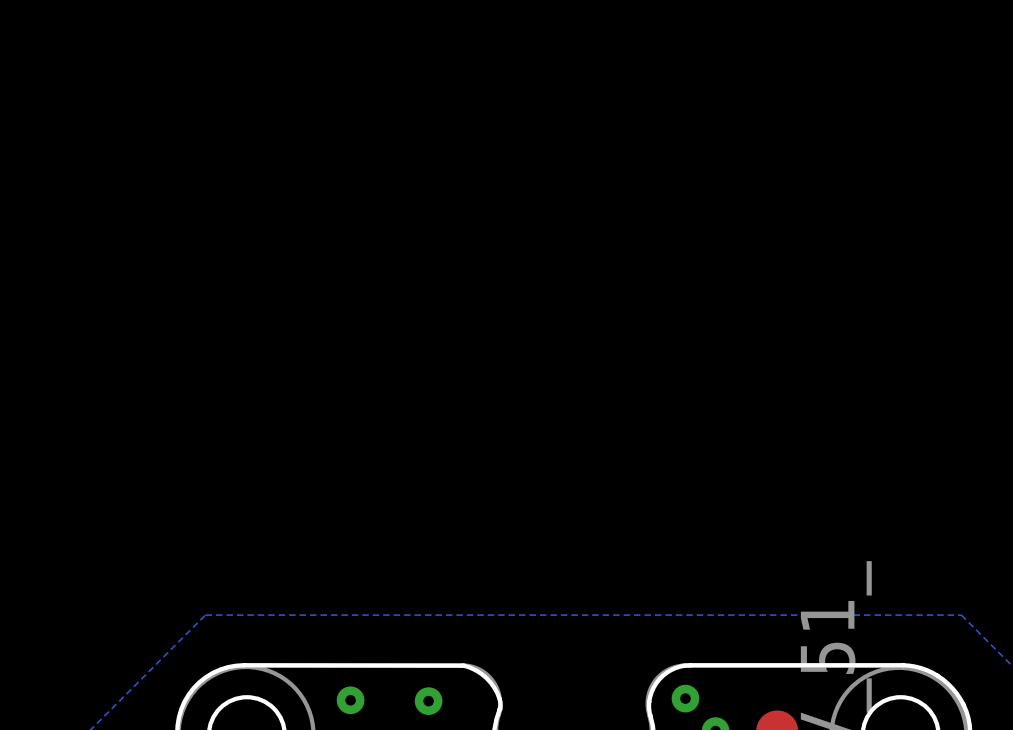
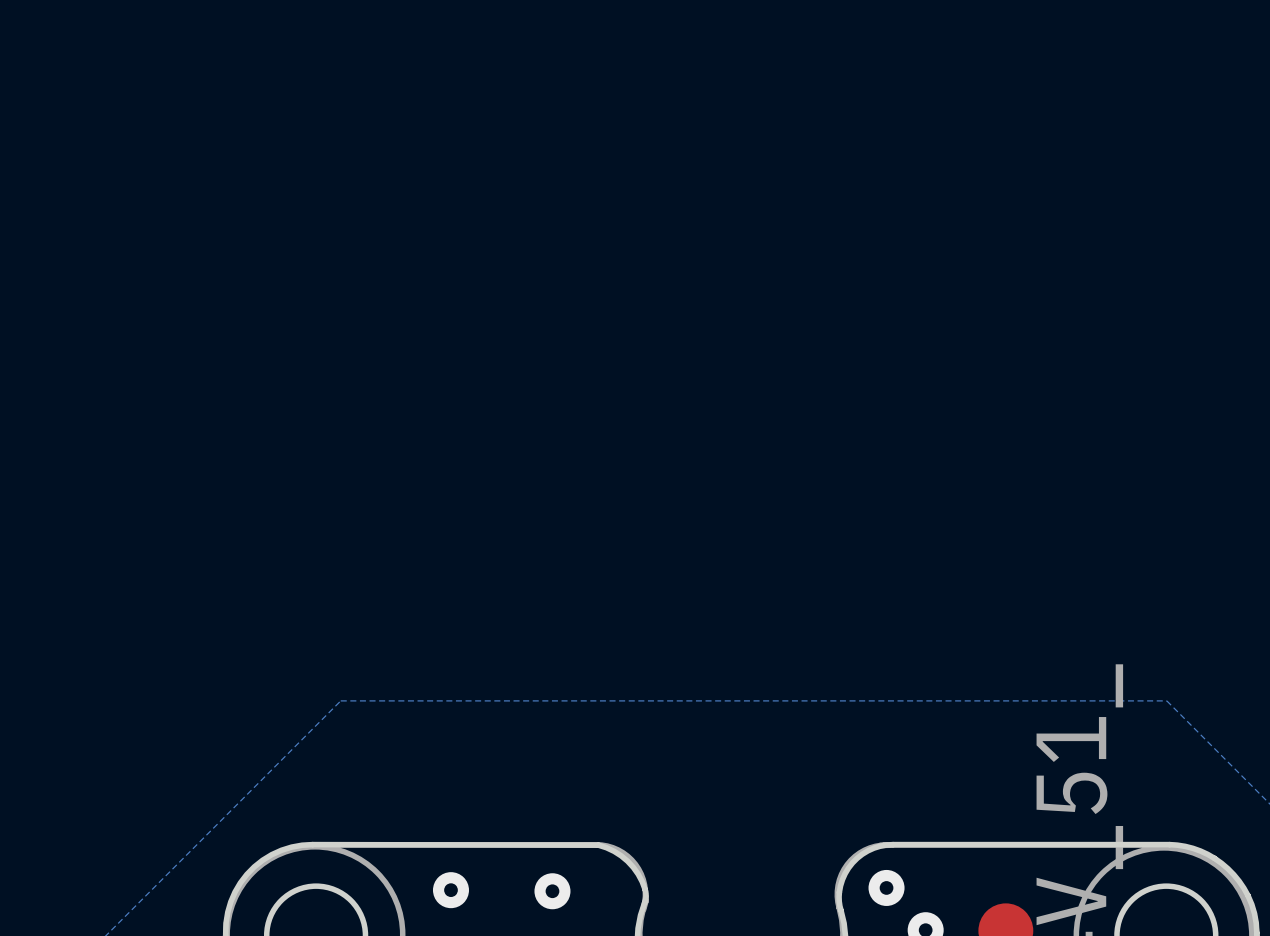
bottom zone outline: (205, 615) (961, 615) -> (262, 779) (340, 700) (1166, 700) (1245, 779)

